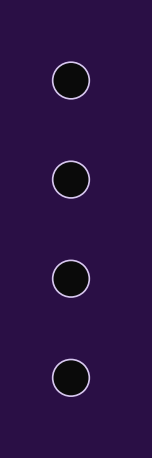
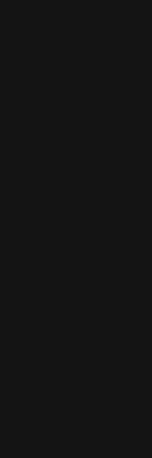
part: (70, 80) -> none
part: (70, 179) -> none
part: (70, 278) -> none
part: (70, 377) -> none

